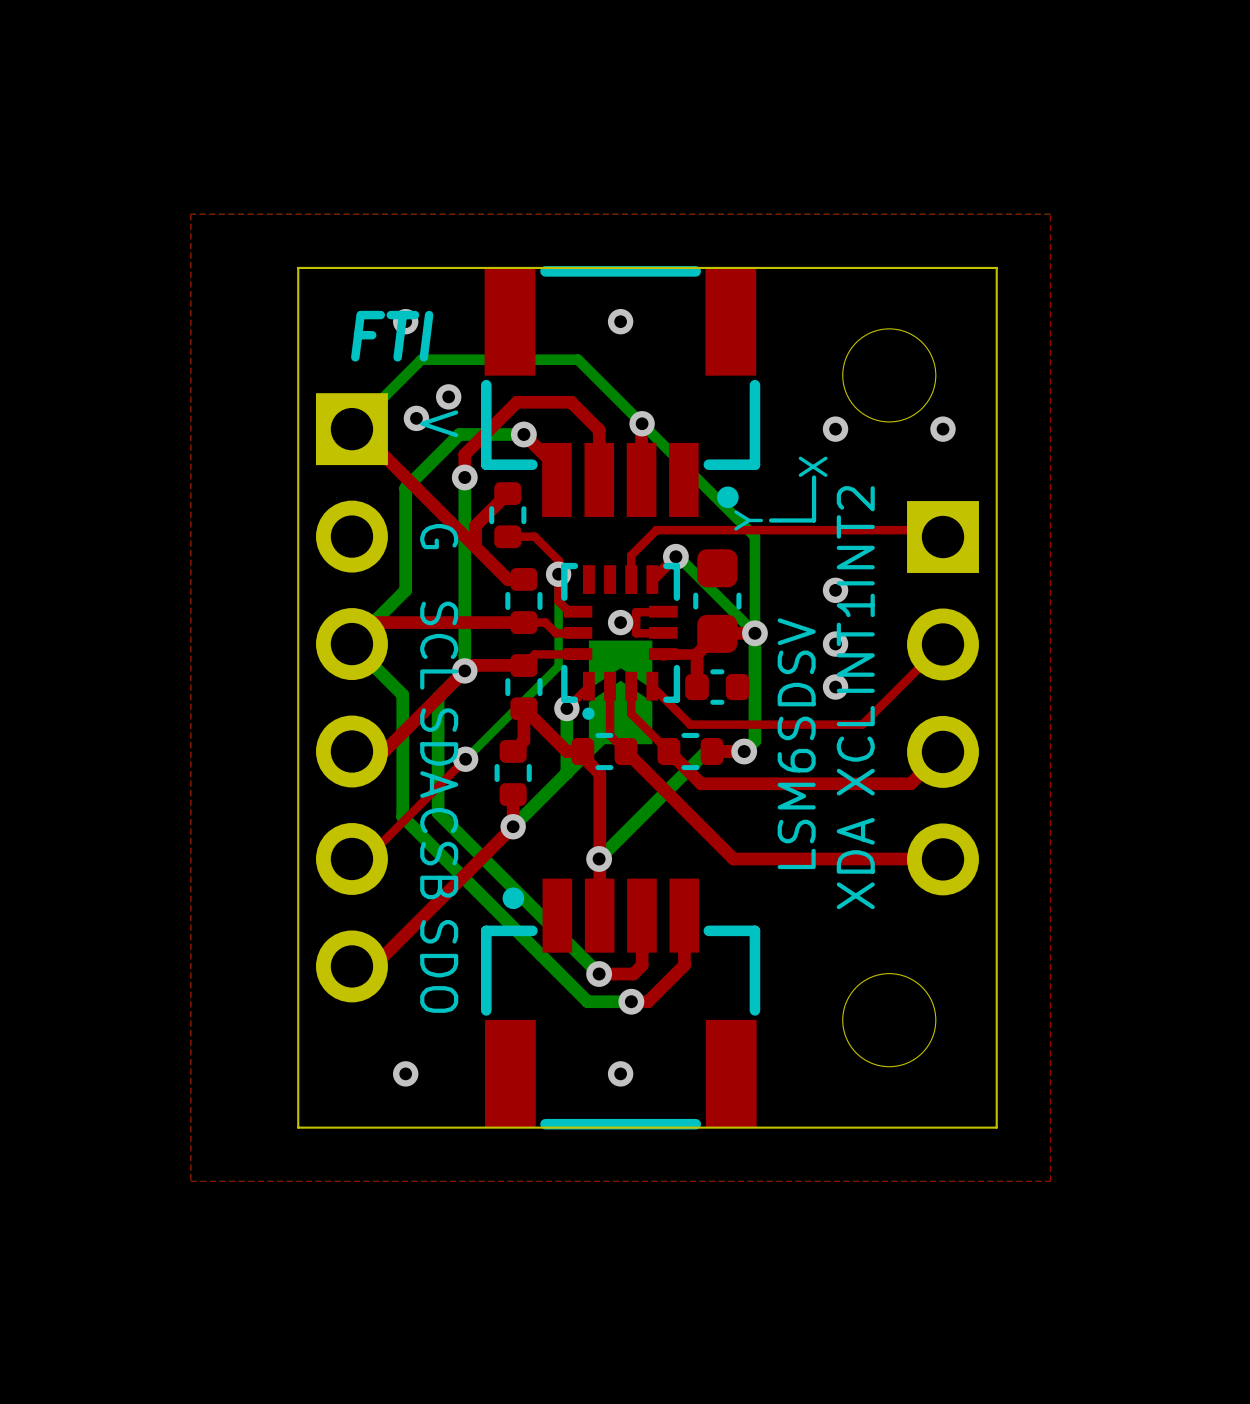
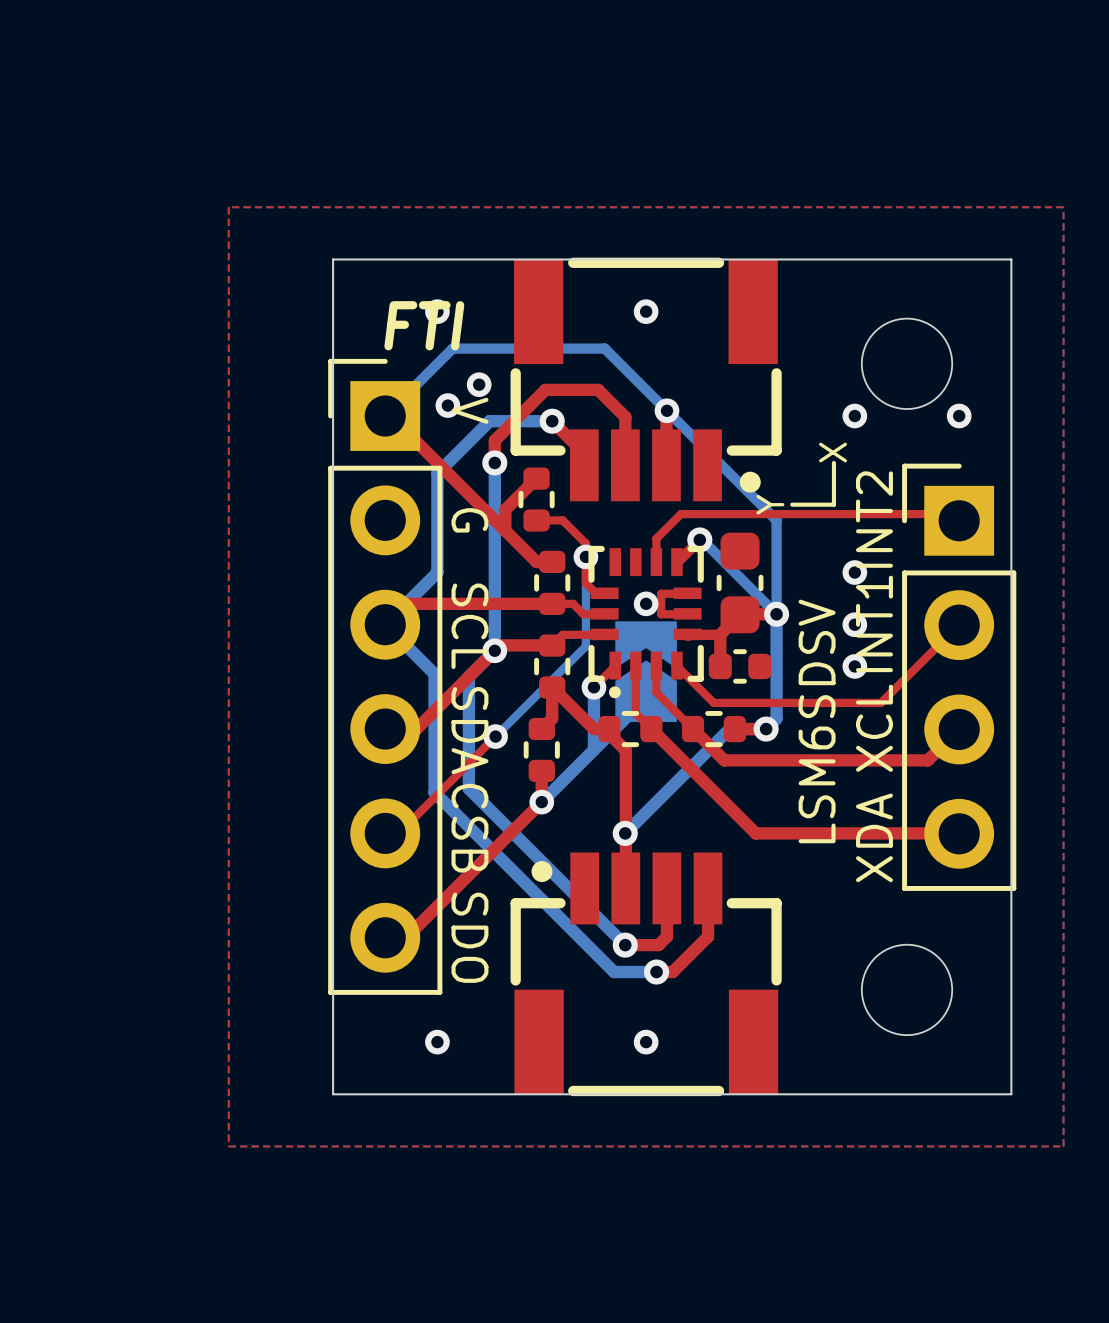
part side: bottom (351, 697) -> top (385, 676)
part side: bottom (943, 698) -> top (959, 677)

